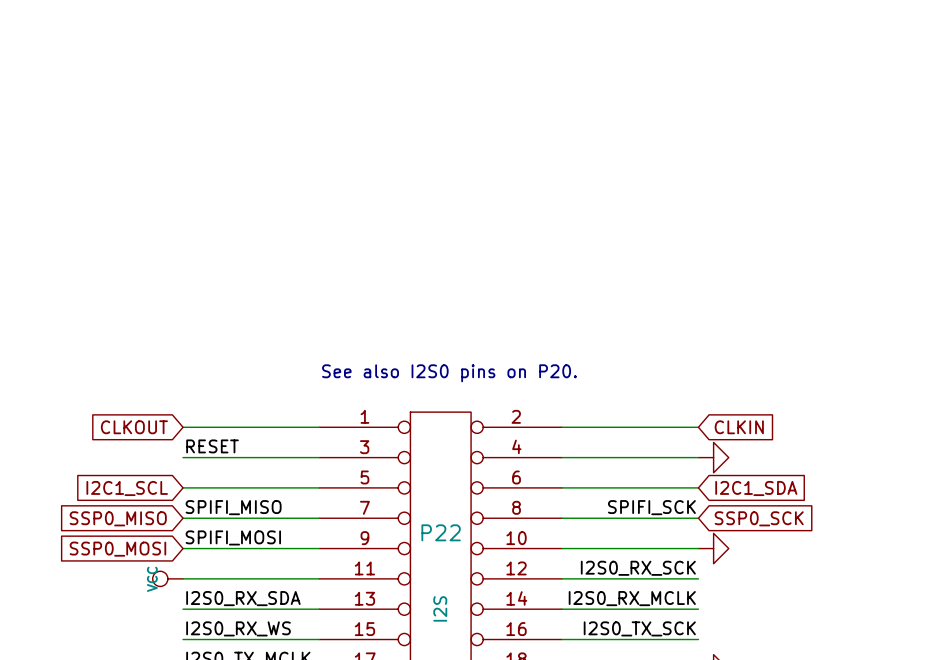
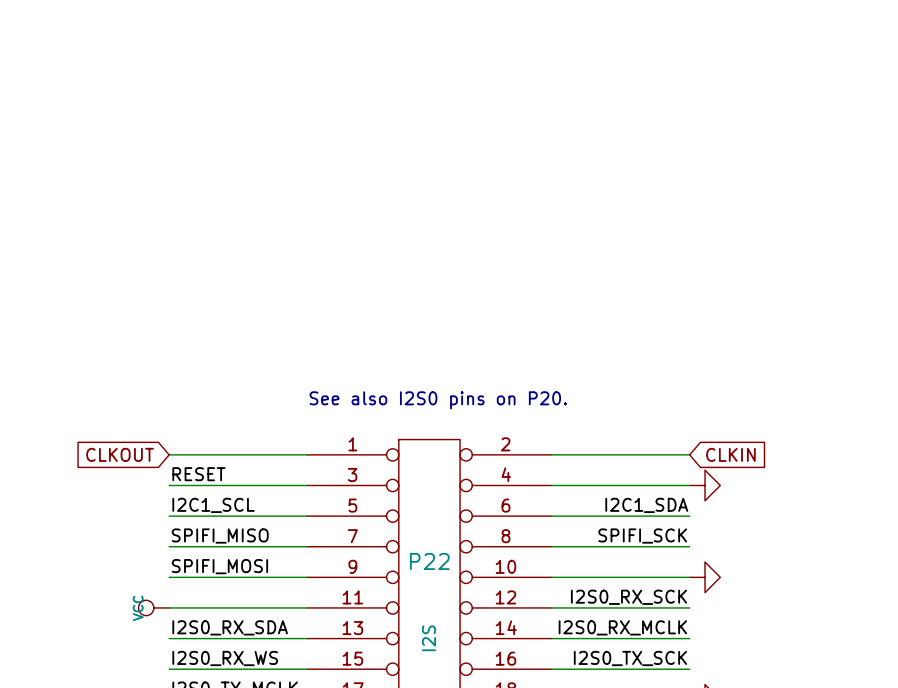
label: none -> I2C1_SCL (213, 505)
label: none -> I2C1_SDA (646, 505)
global label: I2C1_SCL (127, 488) -> none
global label: I2C1_SDA (756, 488) -> none
global label: SSP0_MISO (118, 518) -> none
global label: SSP0_SCK (759, 518) -> none
global label: SSP0_MOSI (117, 549) -> none

